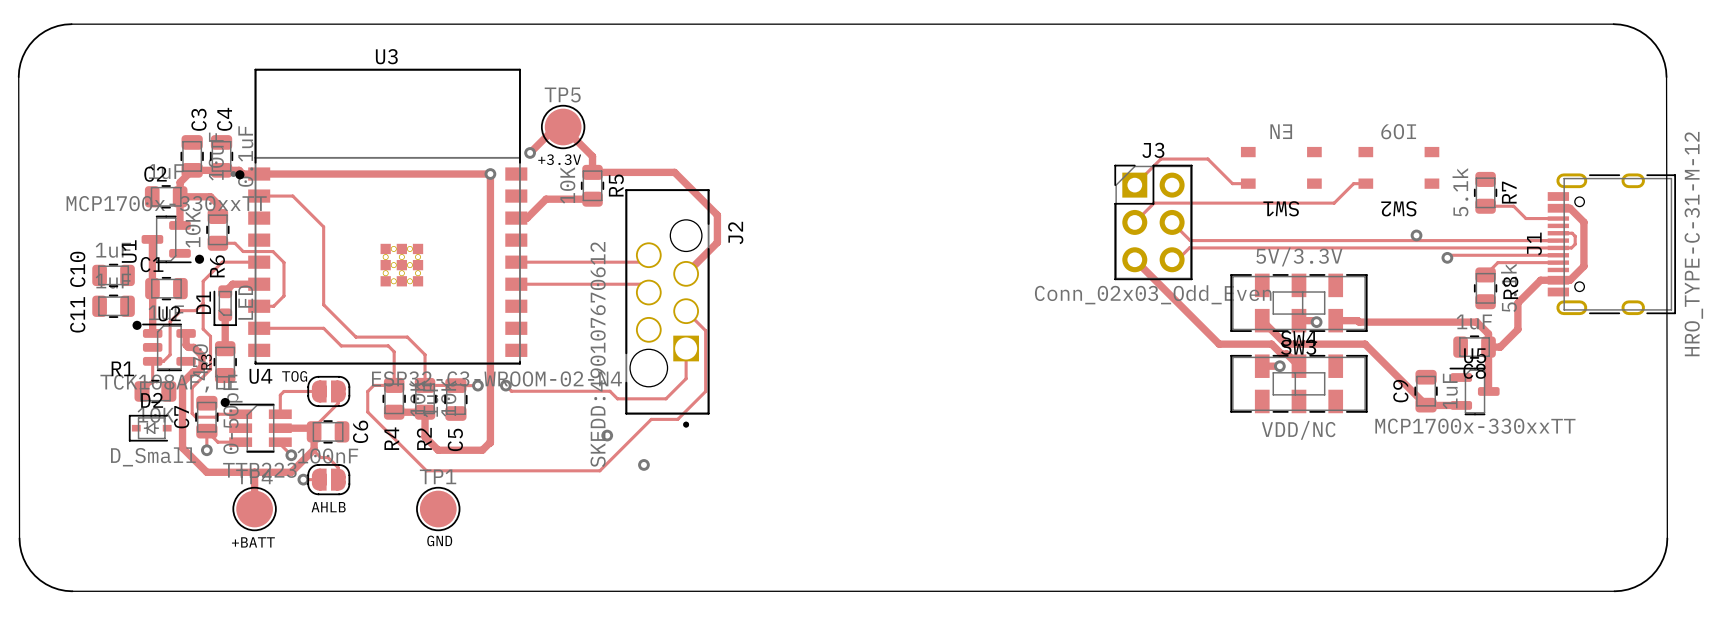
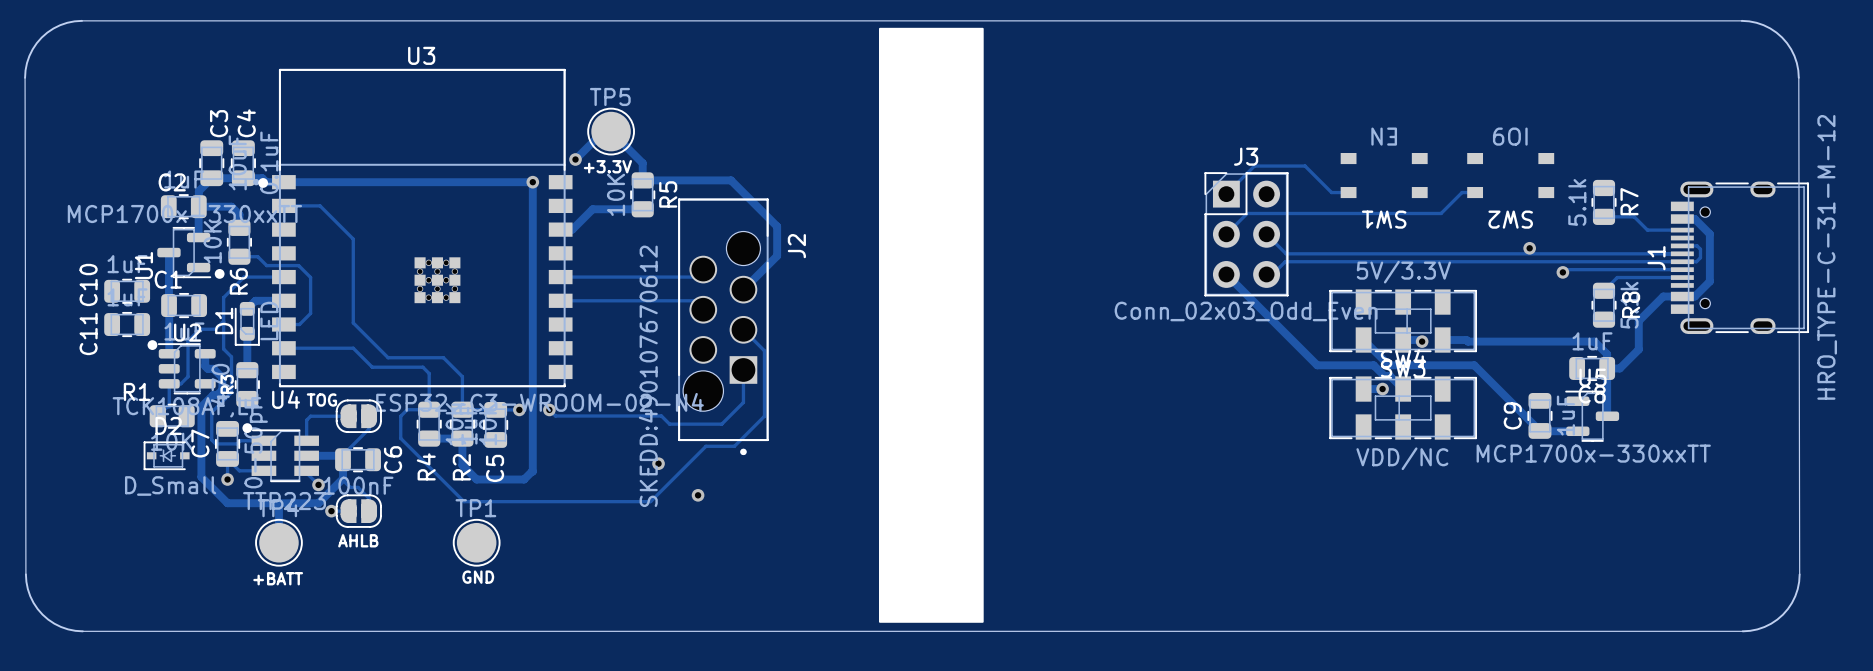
drawing: none -> [878, 27, 984, 623]

